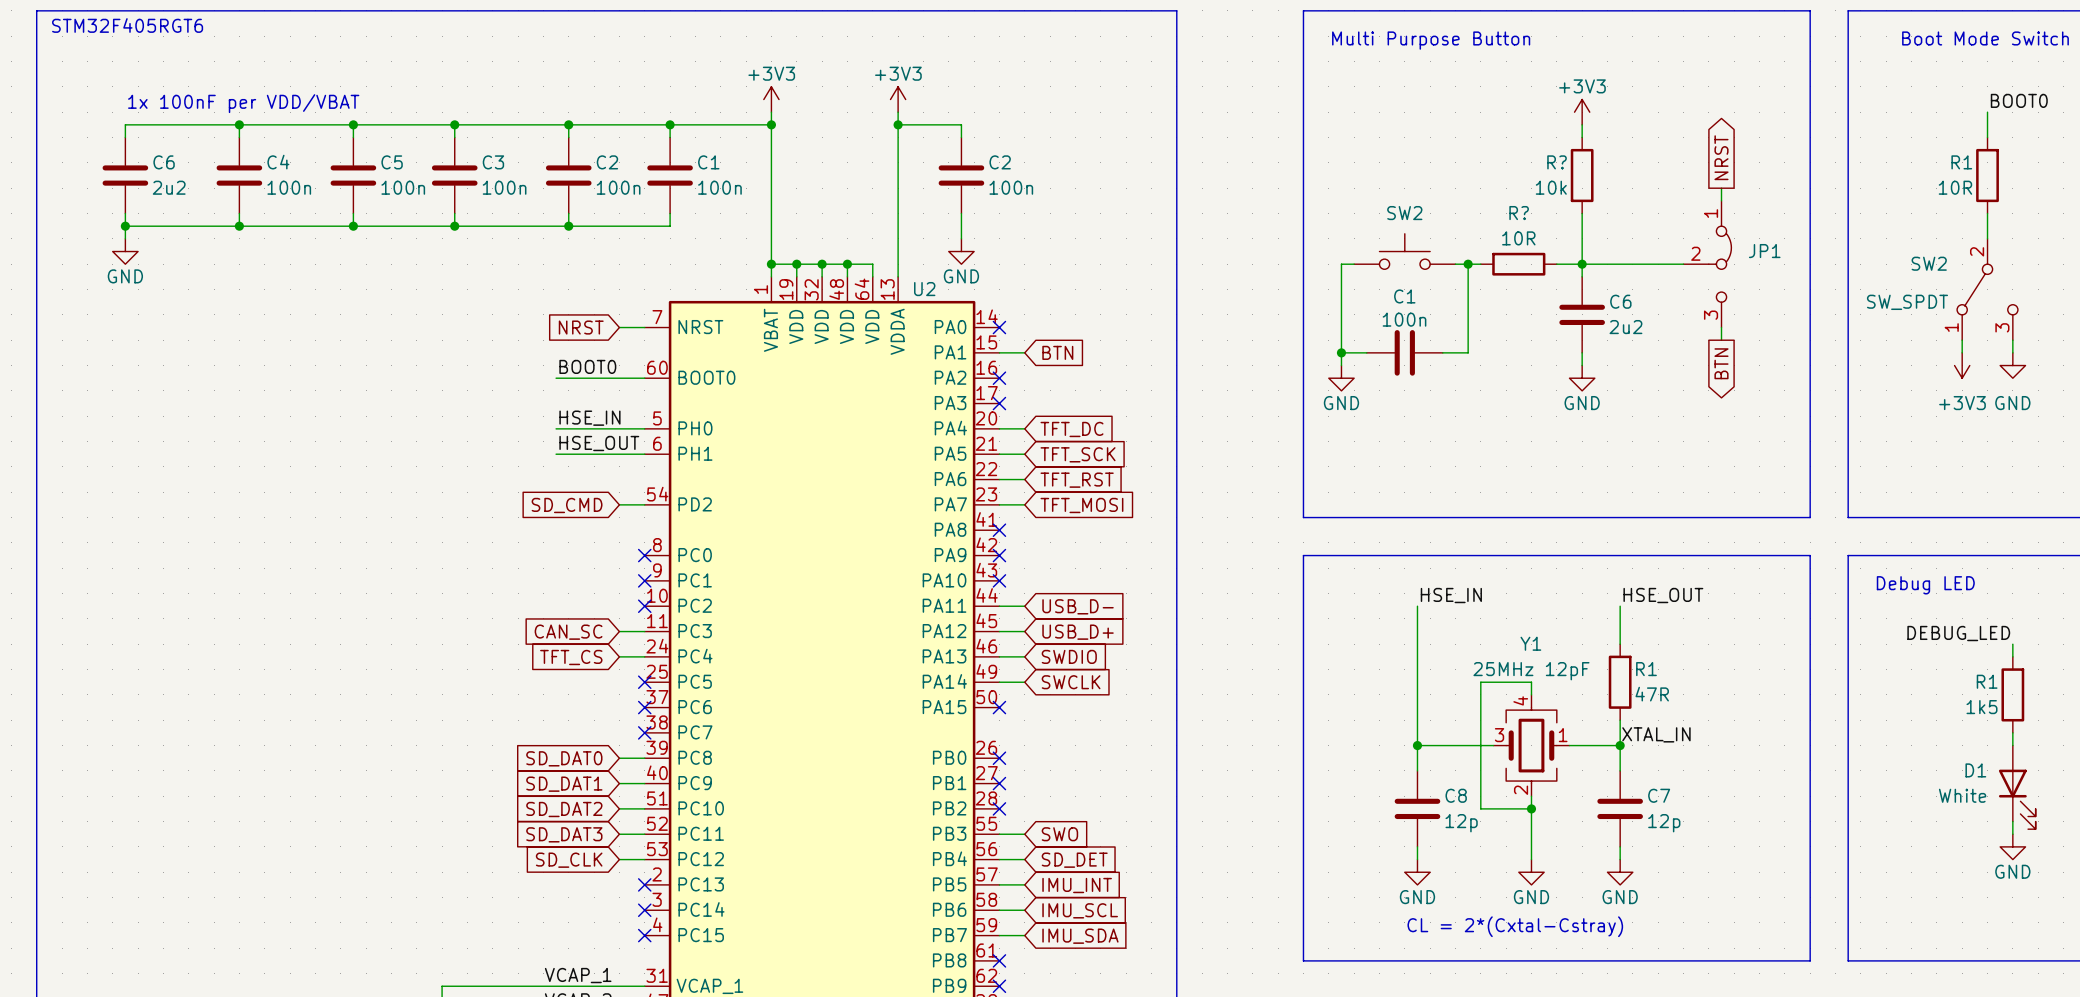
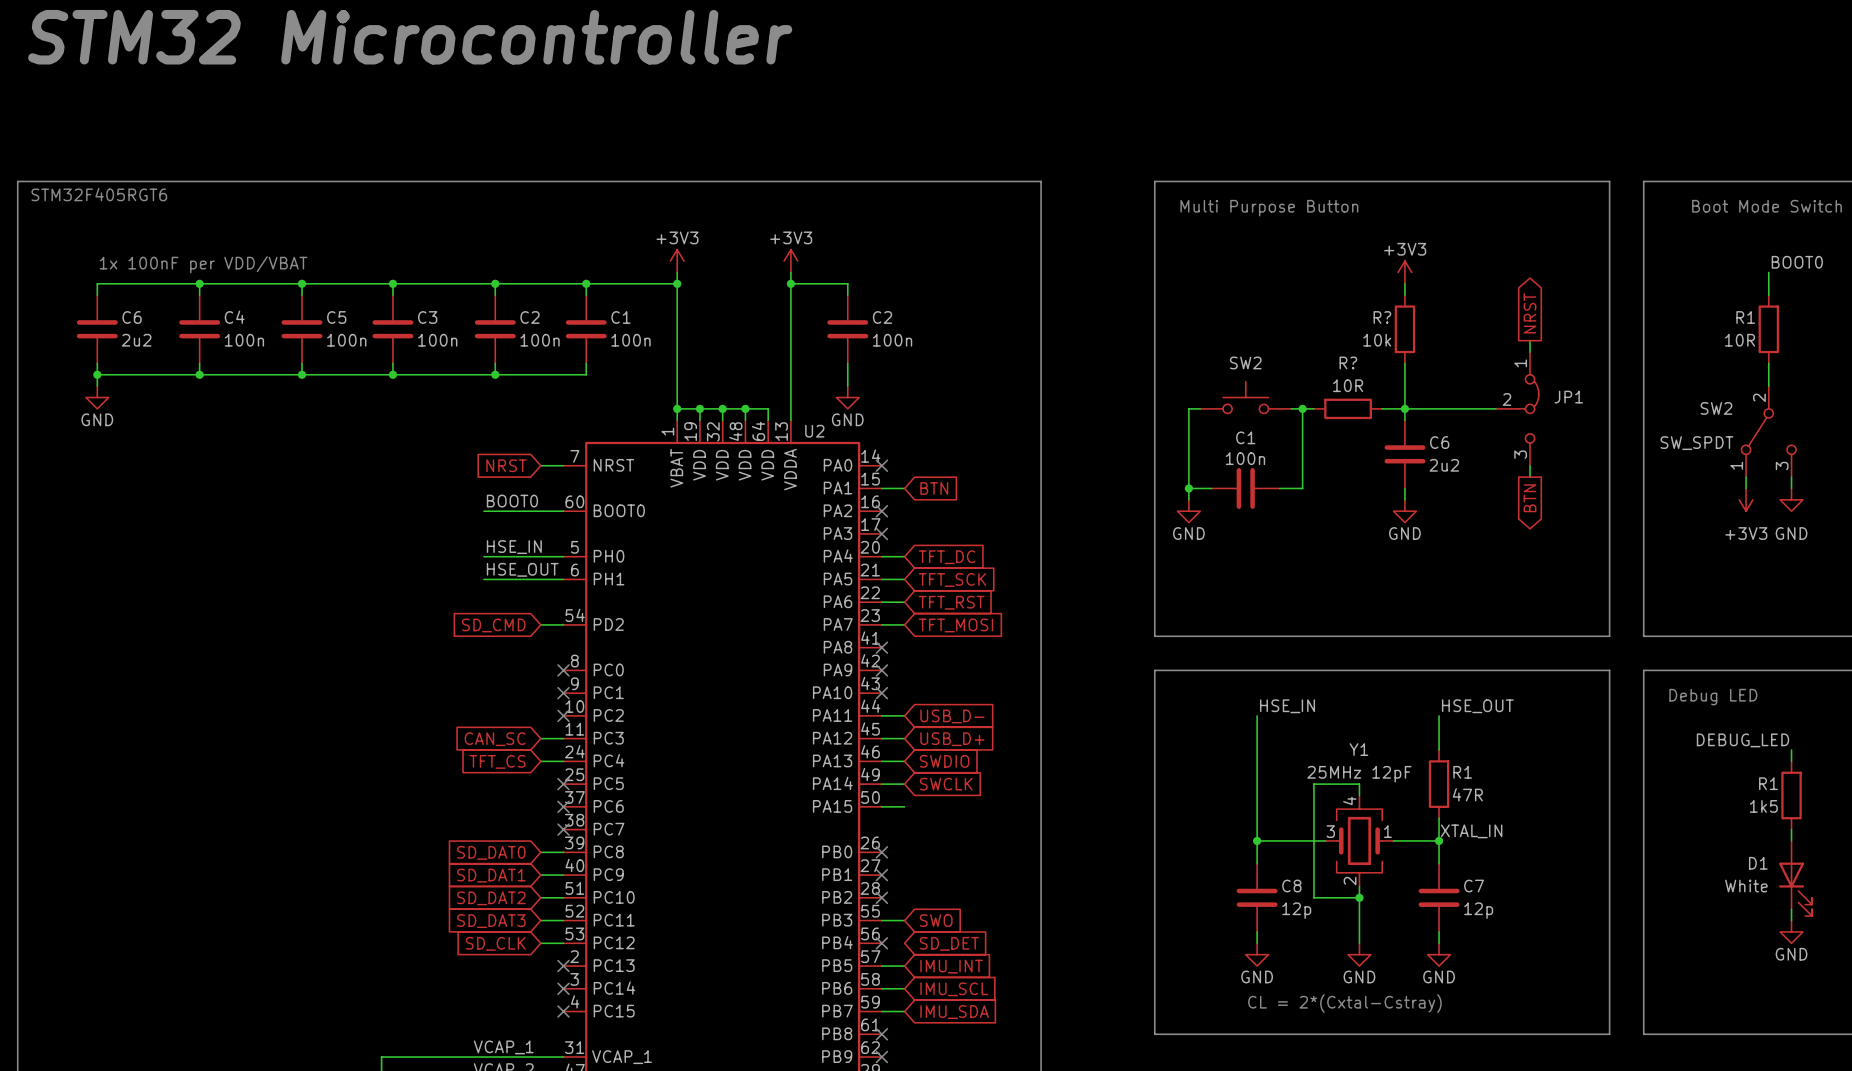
no-connect mark: (999, 707) -> none
wire: (999, 859) (1024, 859) -> (881, 806) (904, 806)
no-connect mark: none -> (881, 943)

